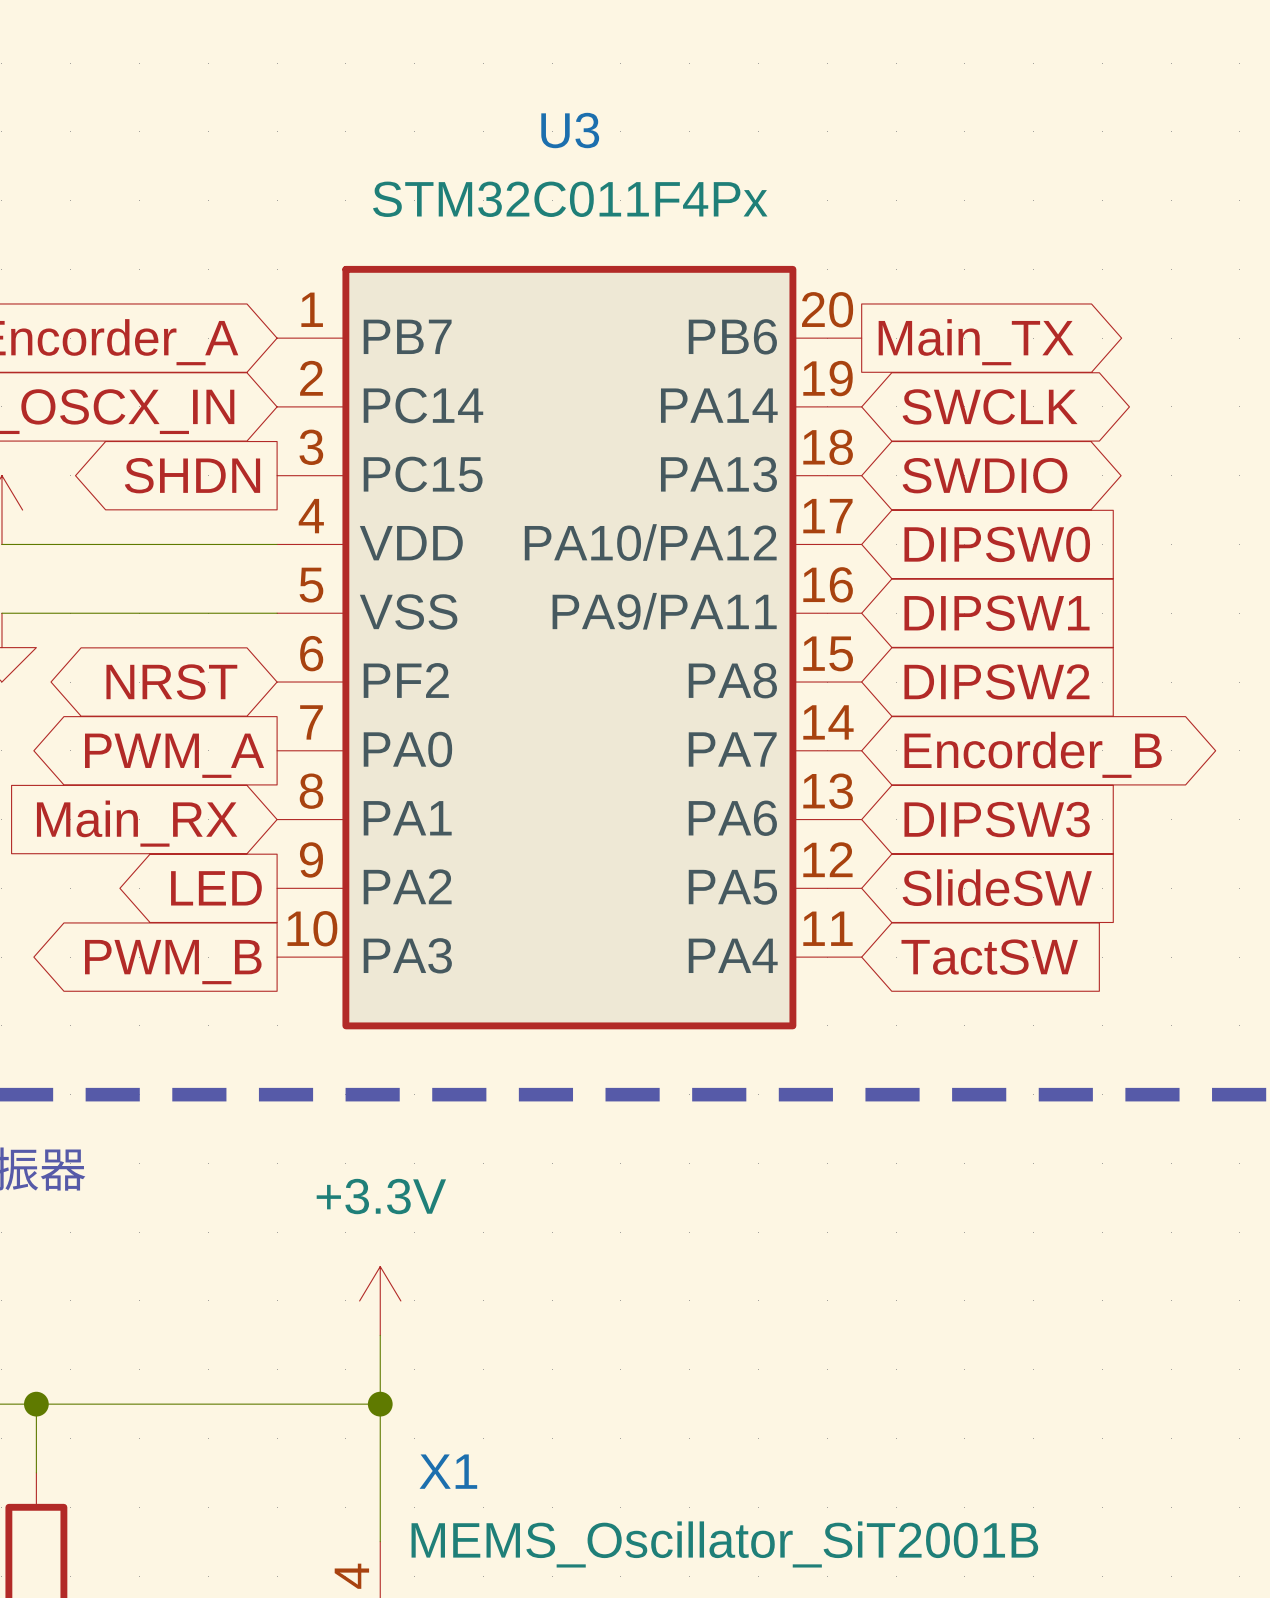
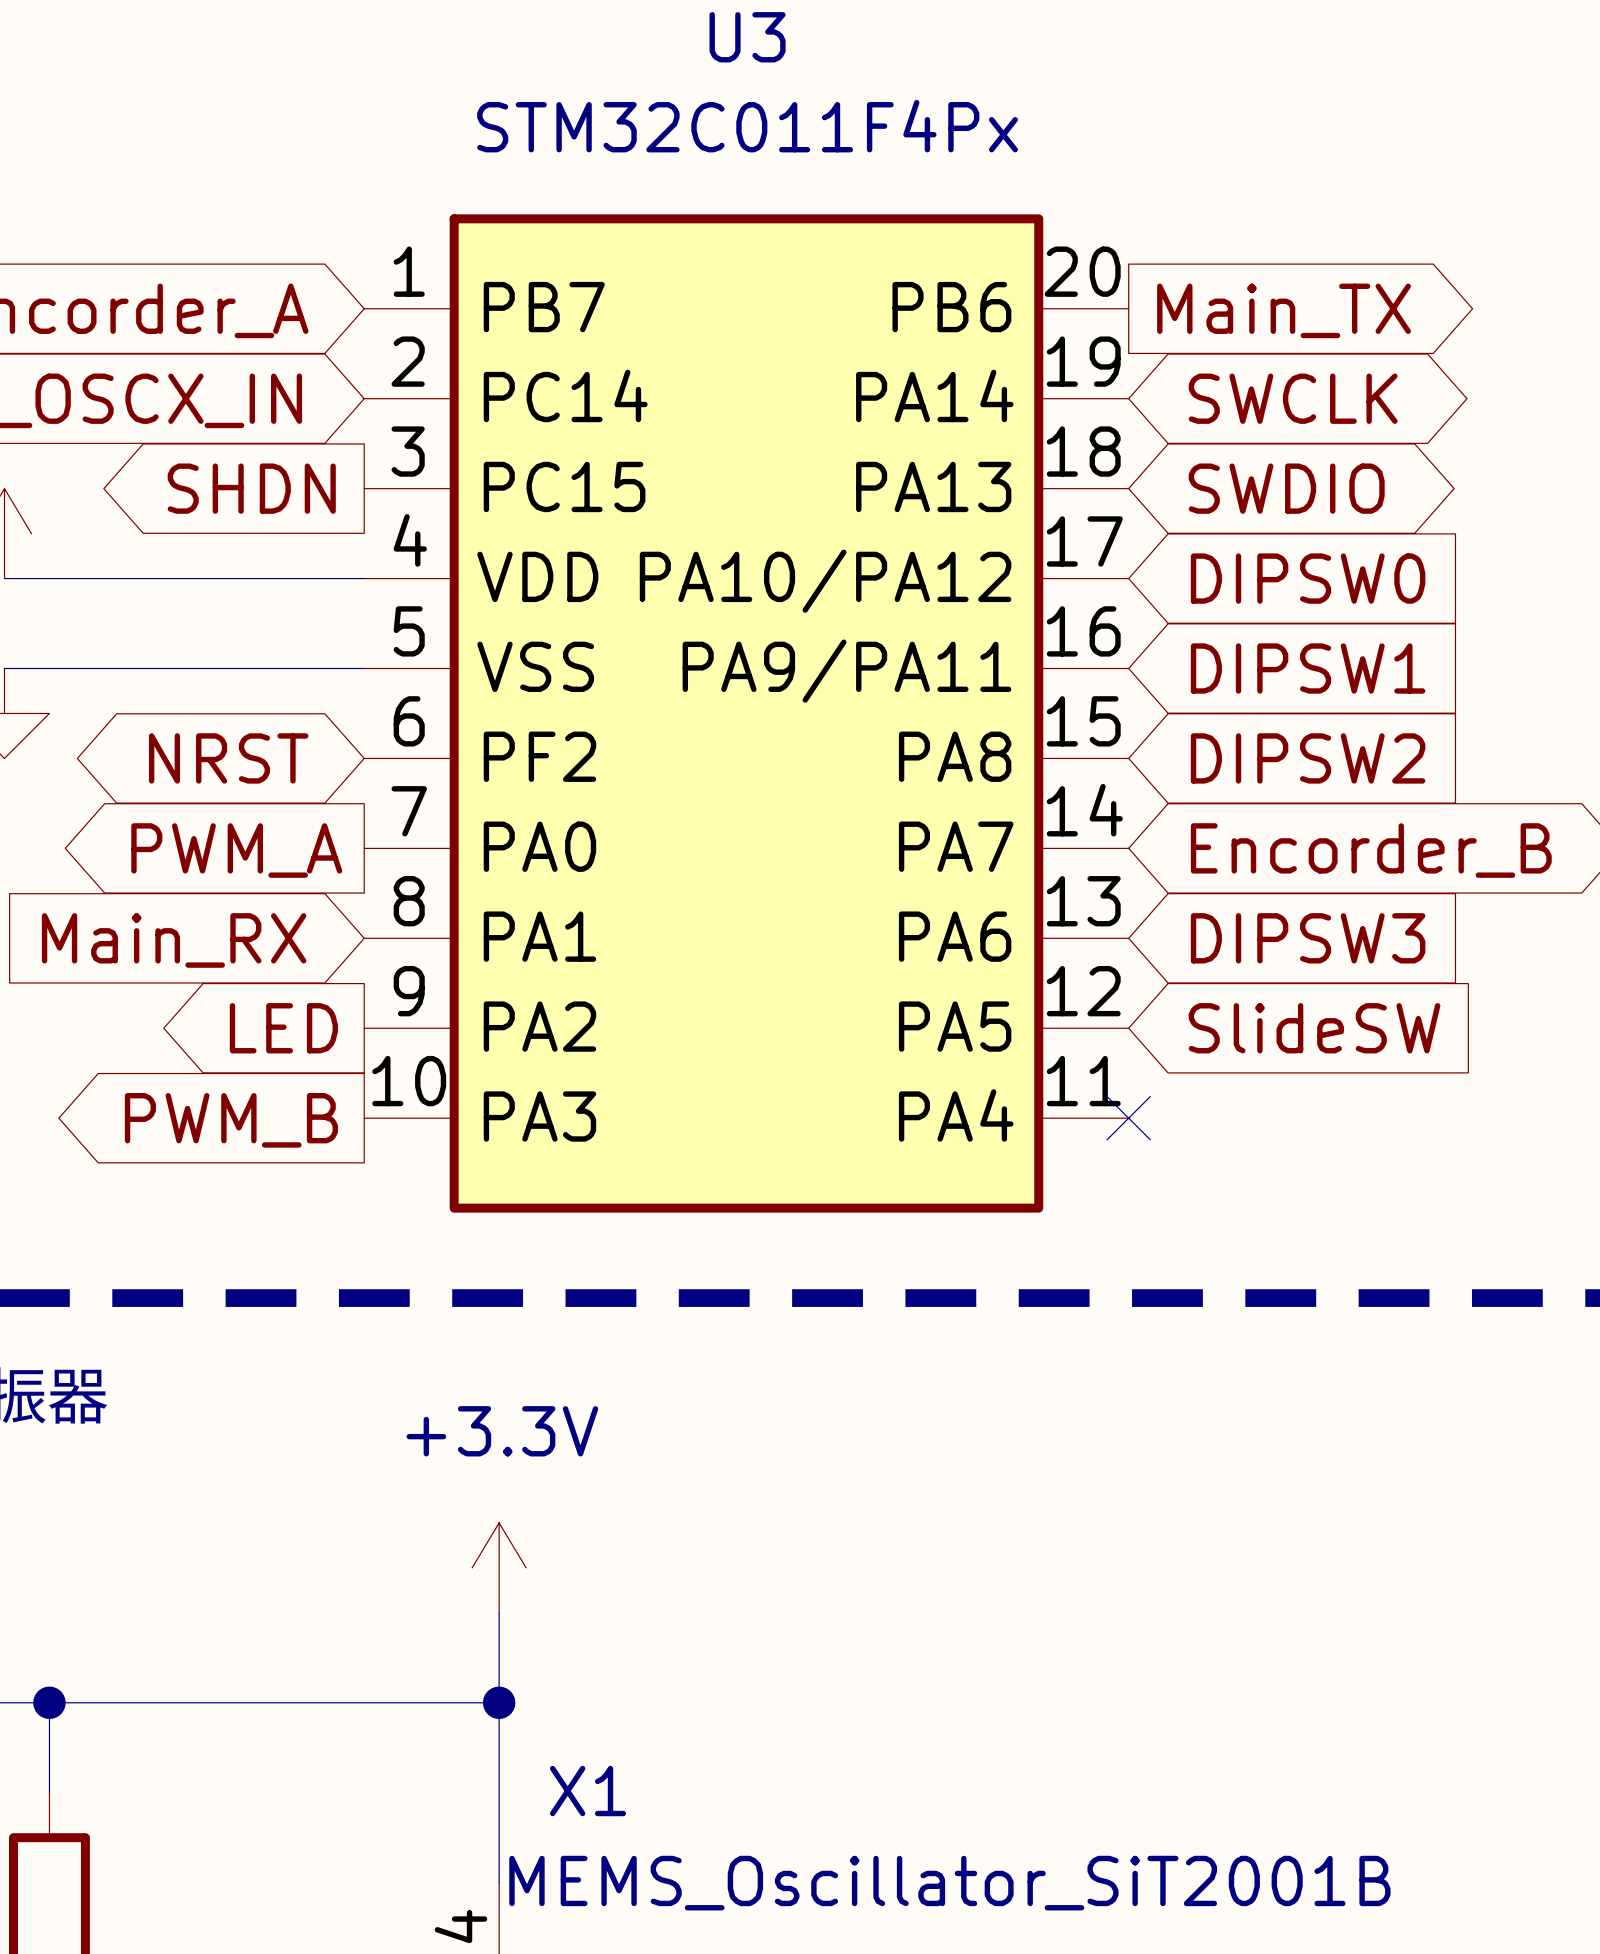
no-connect mark: none -> (1128, 1118)
global label: TactSW (989, 957) -> none

